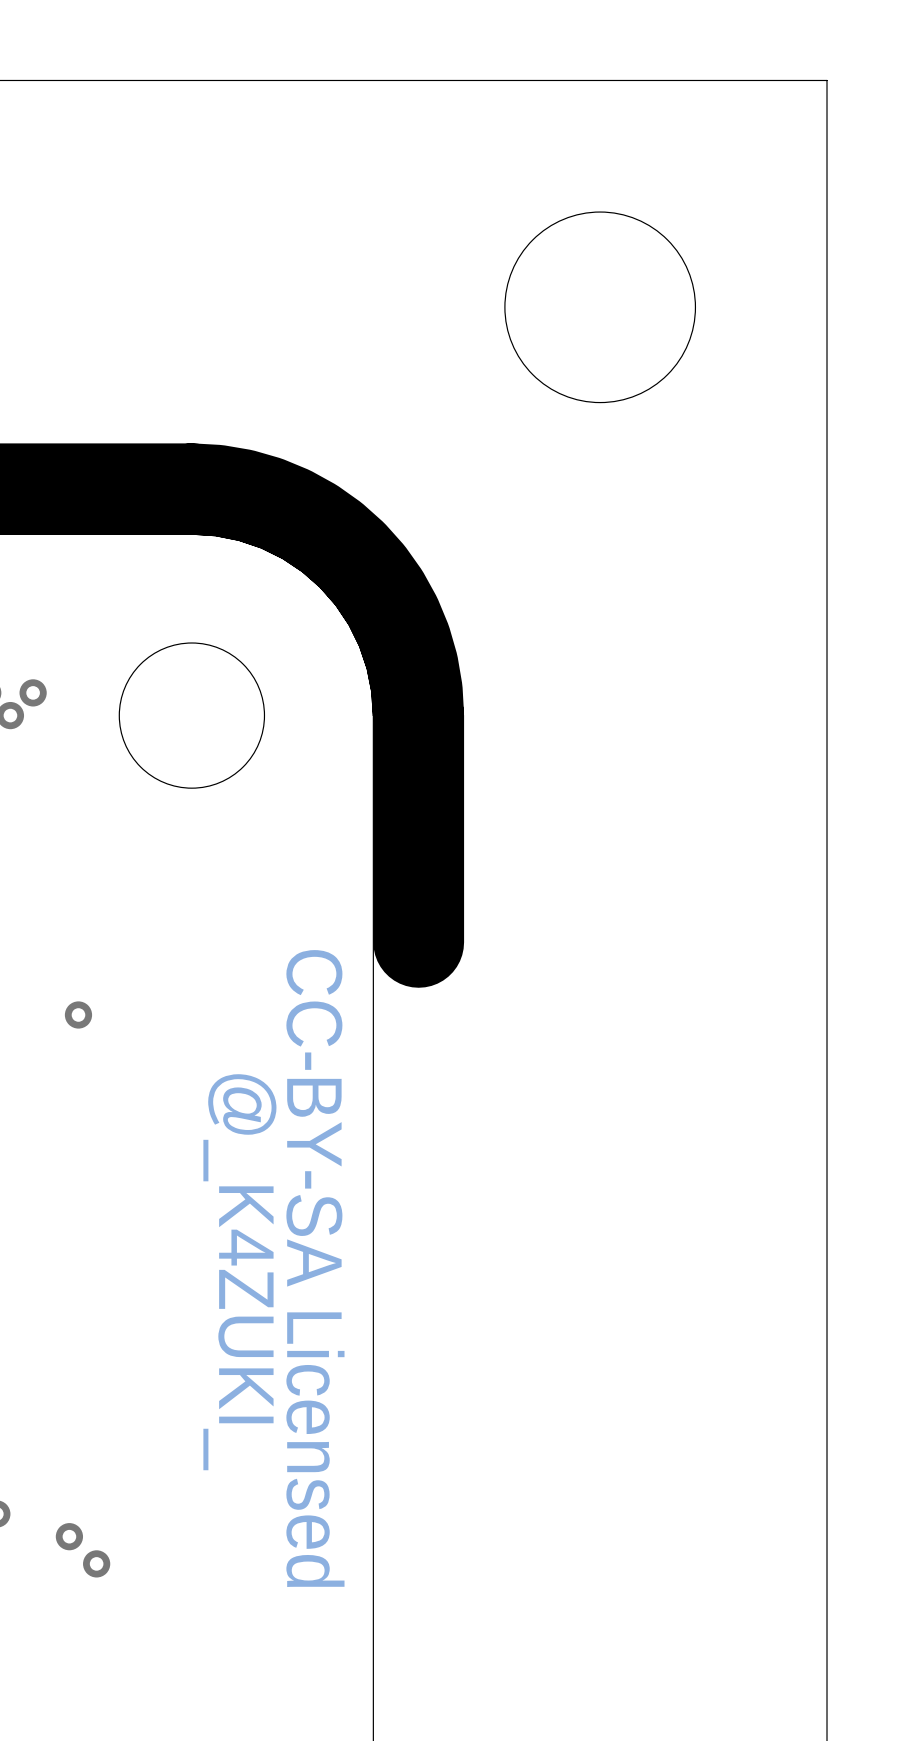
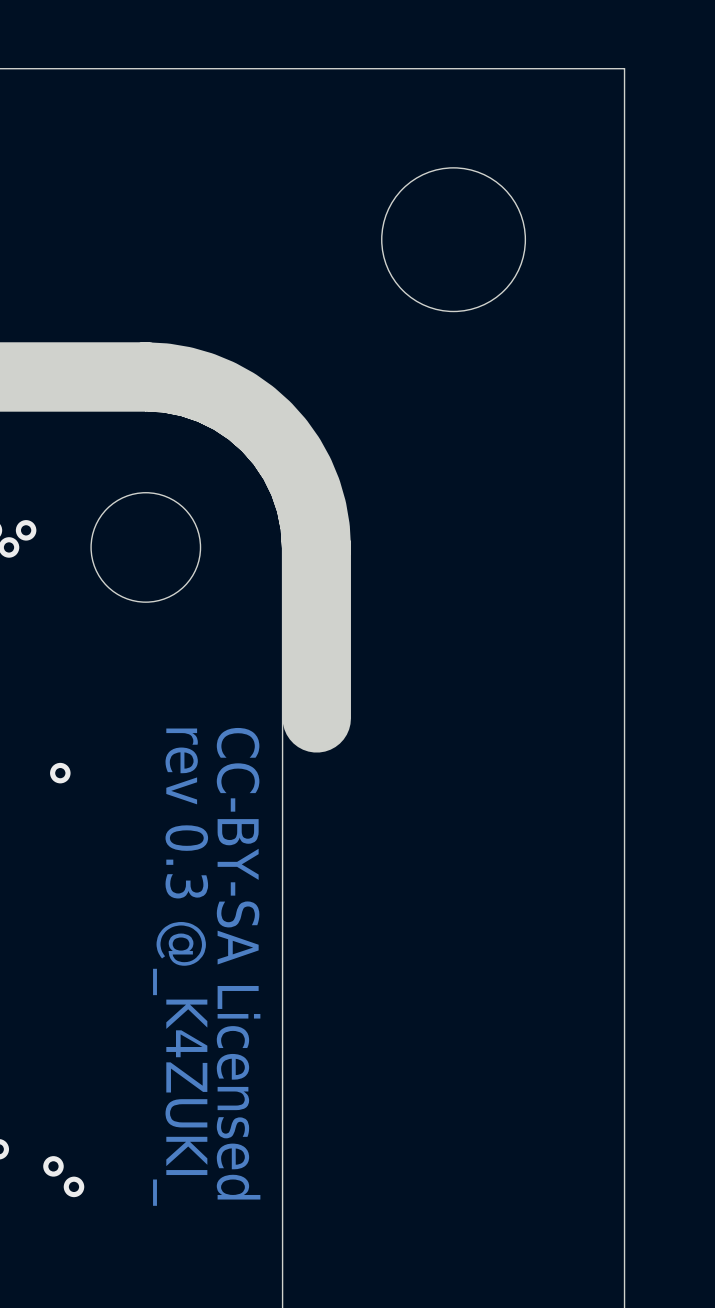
text: @_K4ZUKI_ (239, 1272) -> rev 0.3 @_K4ZUKI_ (180, 967)

